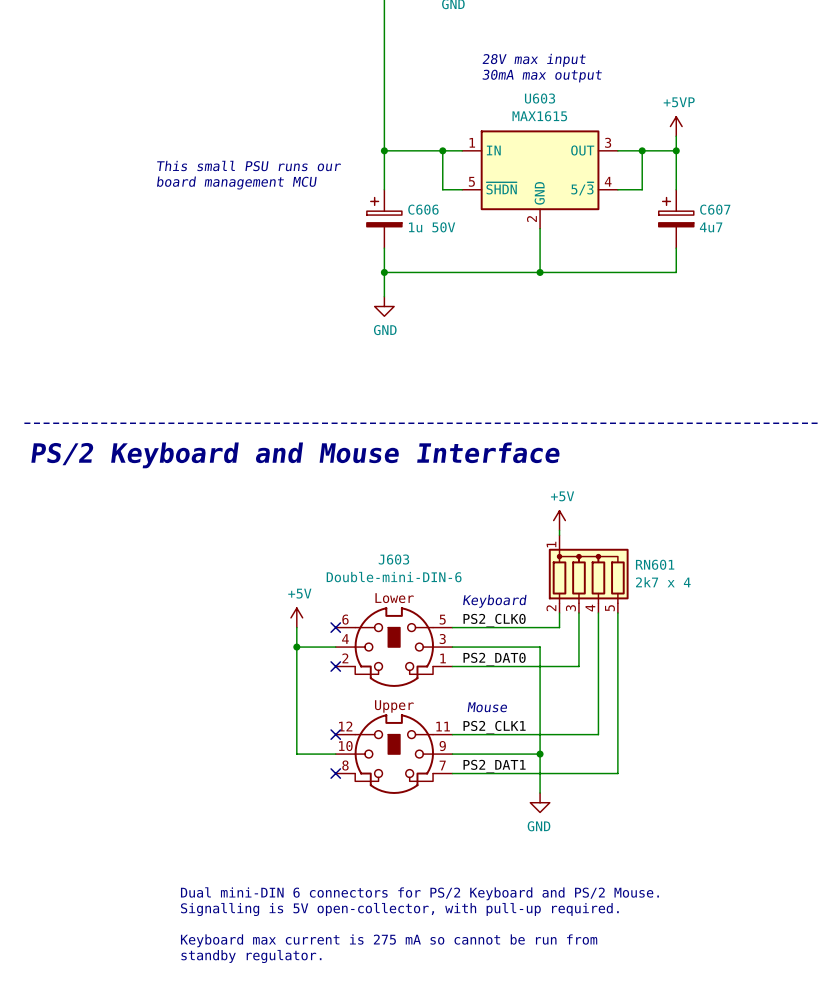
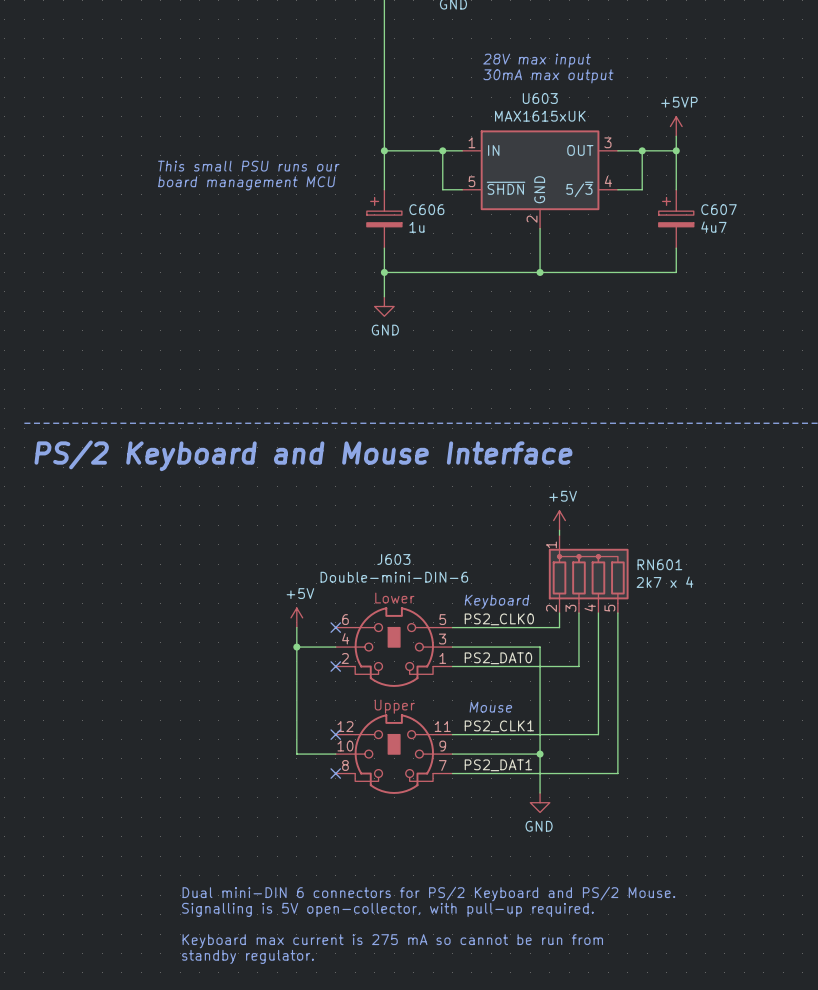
U603 value: MAX1615 (539, 116) -> MAX1615xUK (540, 116)
C606 value: 1u 50V (432, 227) -> 1u (416, 227)

